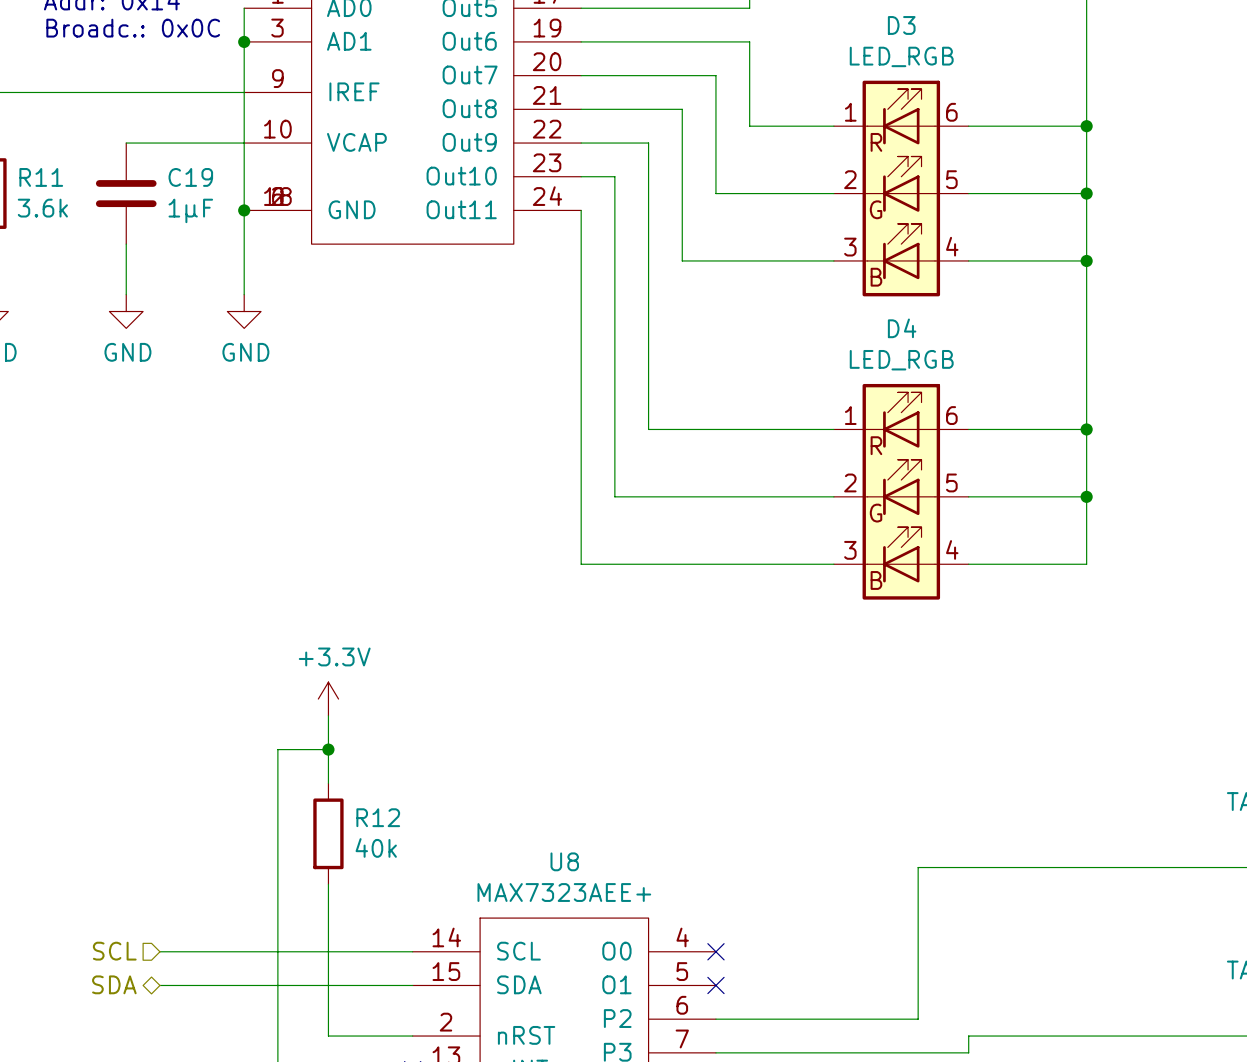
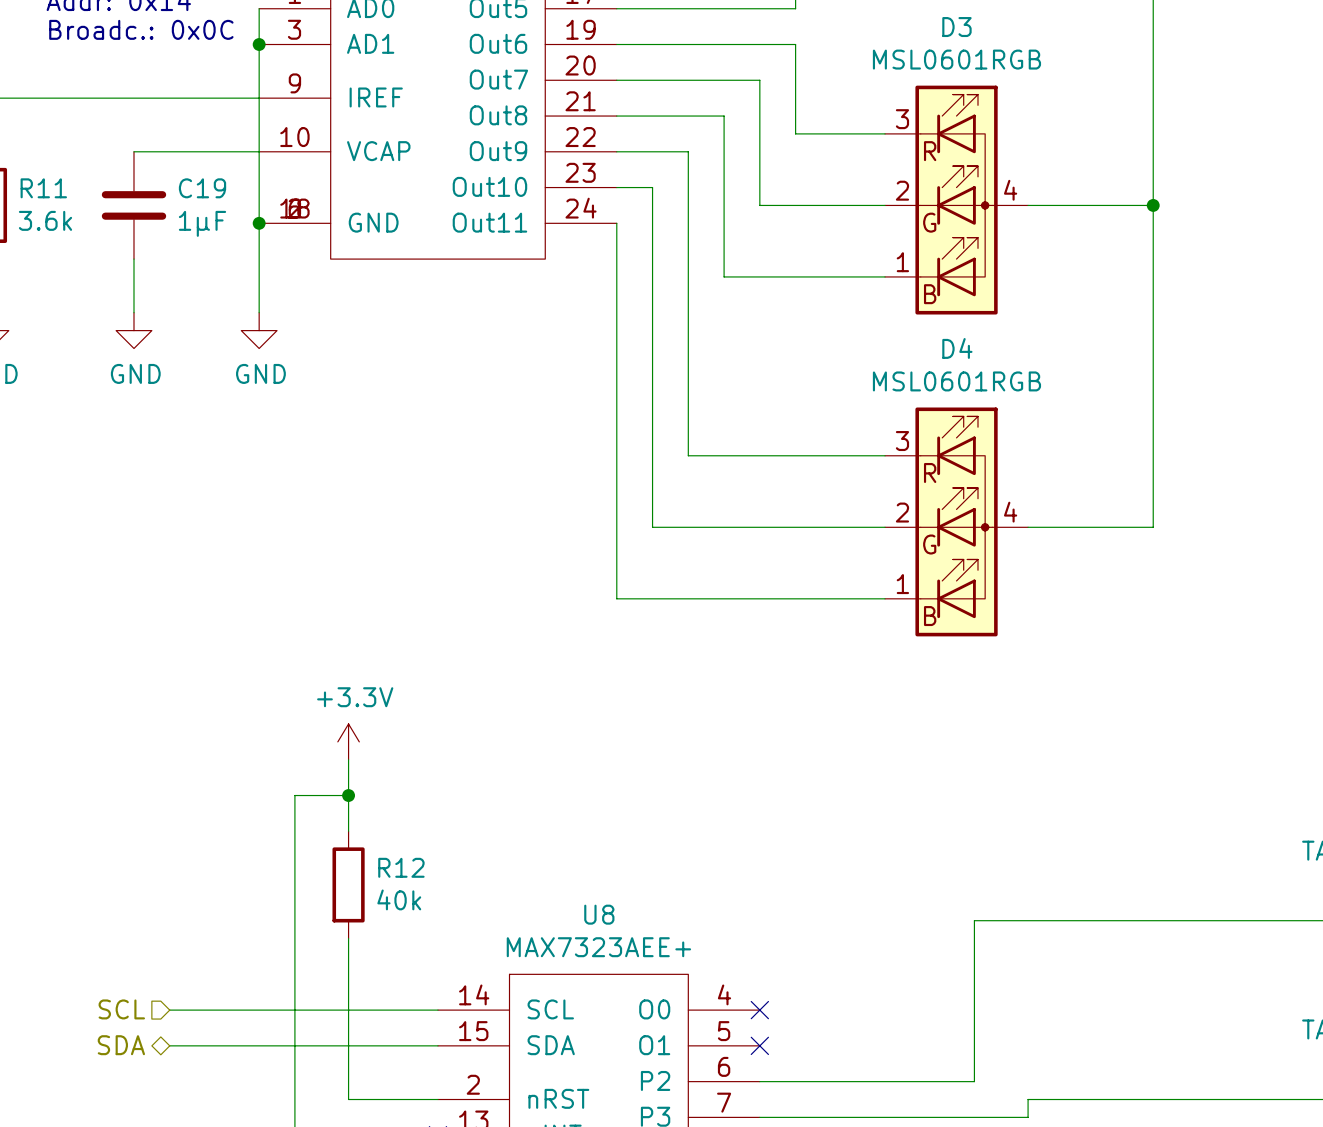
D3 value: LED_RGB (901, 56) -> MSL0601RGB (956, 59)
D3 symbol: [833, 80, 969, 297] -> [885, 85, 1029, 315]
wire: (968, 126) (1086, 126) -> none
junction: (1086, 126) -> none
wire: (968, 260) (1086, 260) -> none
junction: (1086, 260) -> none
D4 value: LED_RGB (901, 360) -> MSL0601RGB (956, 381)
D4 symbol: [833, 383, 969, 600] -> [885, 407, 1029, 637]
wire: (968, 429) (1086, 429) -> none
junction: (1086, 429) -> none
wire: (1086, 496) (1086, 564) (968, 564) -> none
junction: (1086, 496) -> none

